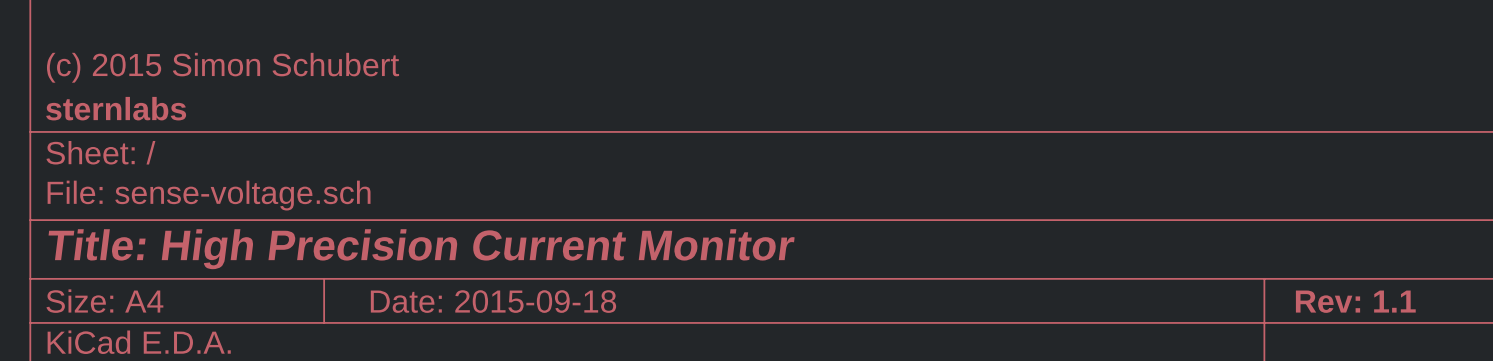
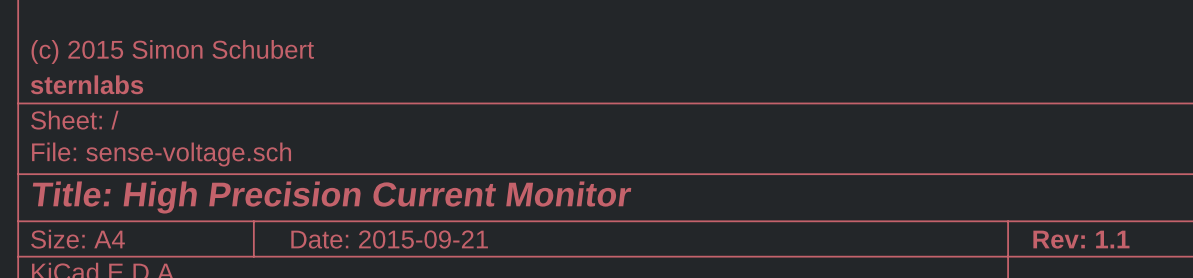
title block: Date: 2015-09-18 (493, 301) -> Date: 2015-09-21 (389, 239)

